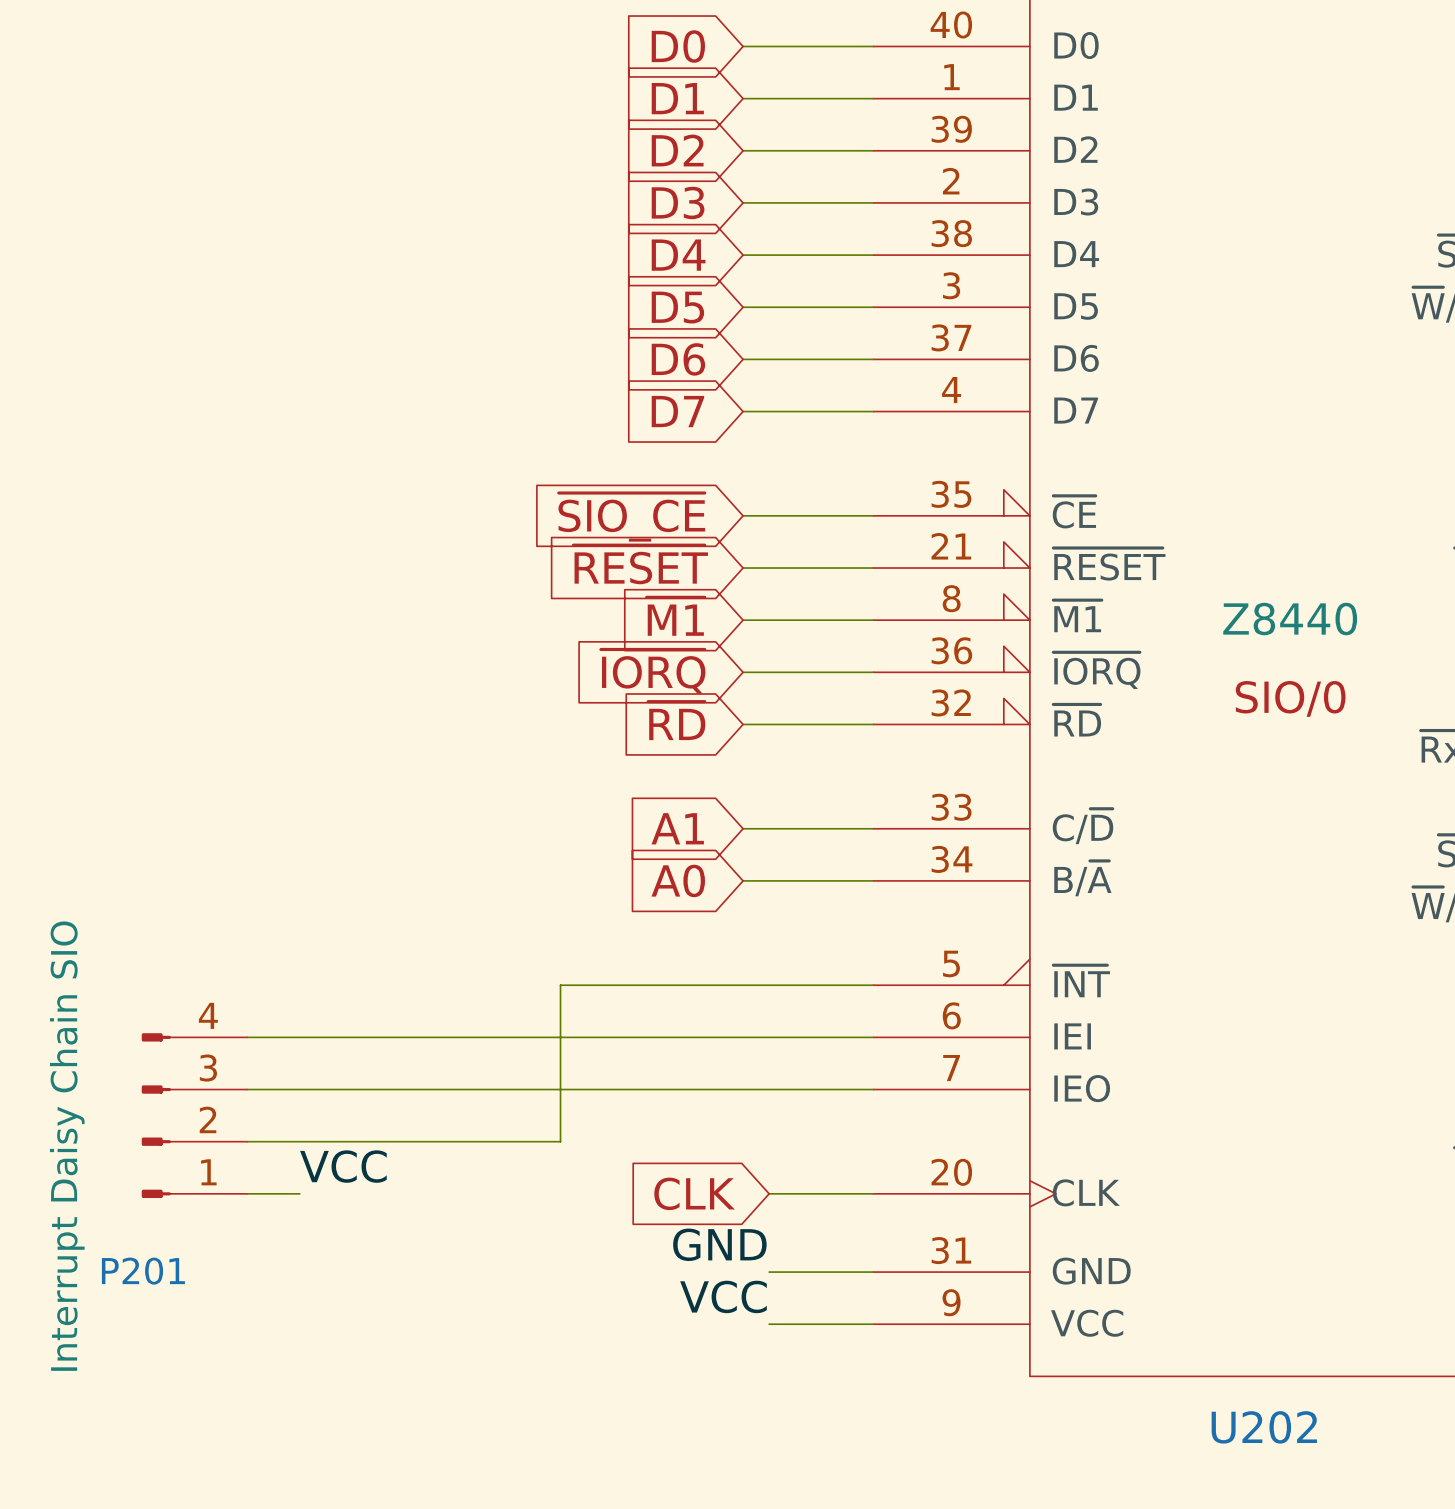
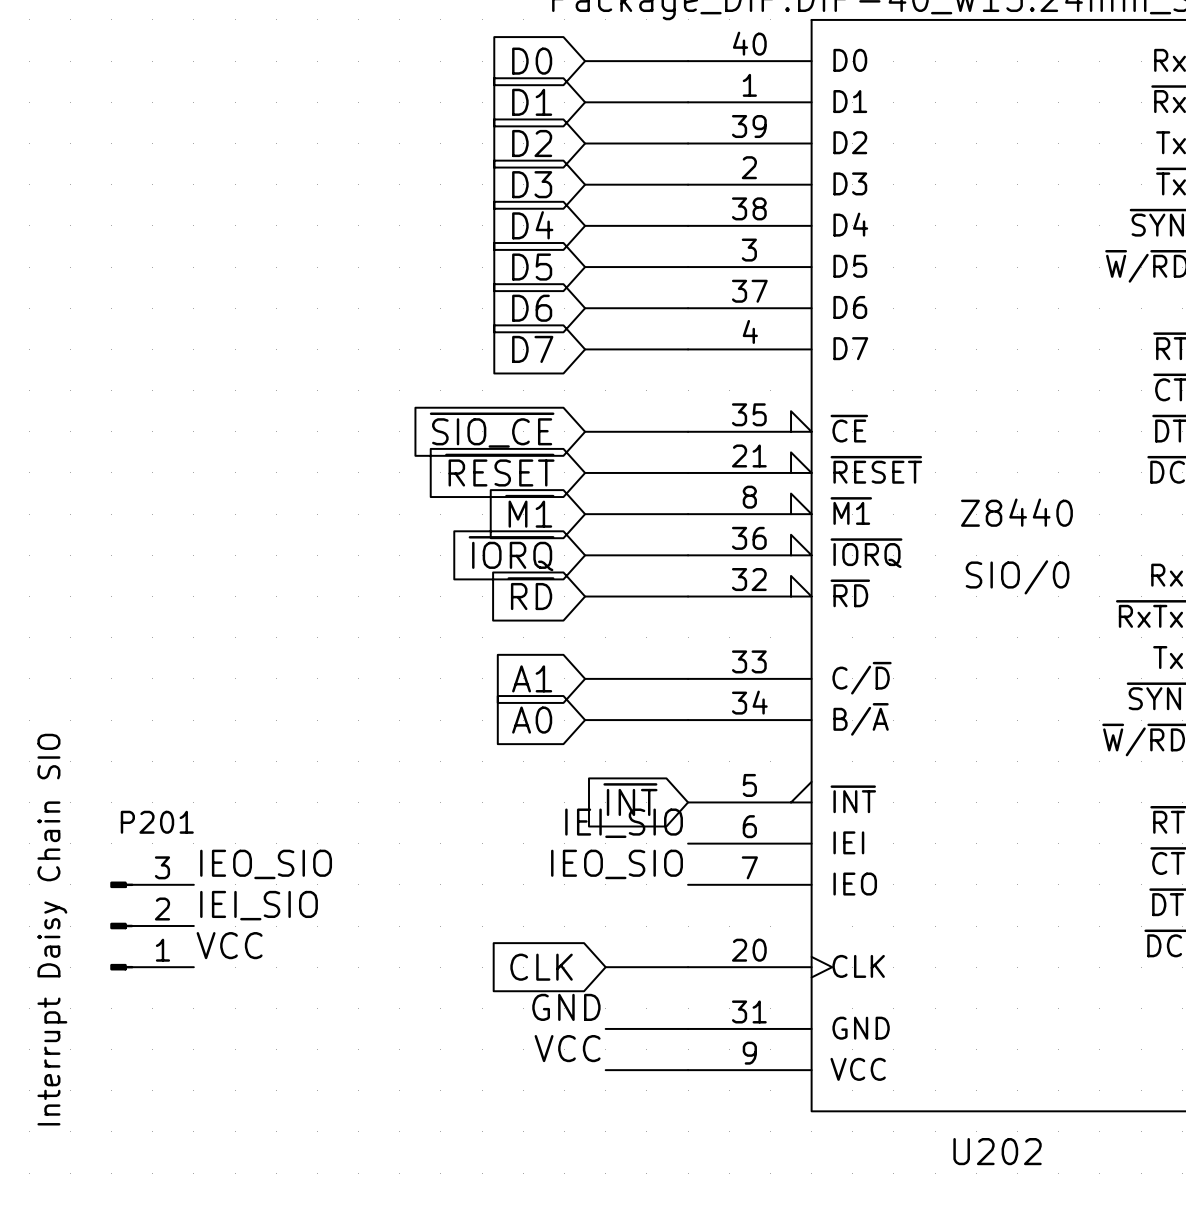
global label: none -> ~{INT} (630, 799)
wire: (873, 985) (560, 985) (560, 1141) (247, 1141) -> none
label: none -> IEI_SIO (624, 823)
P201 symbol: [141, 1033, 248, 1199] -> [110, 881, 194, 971]
wire: (247, 1037) (873, 1037) -> none
label: none -> IEO_SIO (266, 864)
label: none -> IEO_SIO (617, 864)
wire: (247, 1089) (873, 1089) -> none
label: none -> IEI_SIO (259, 905)
label position: VCC (343, 1166) -> VCC (229, 945)
wire: (247, 1193) (299, 1193) -> none
P201 name position: P201 (143, 1271) -> P201 (157, 822)

